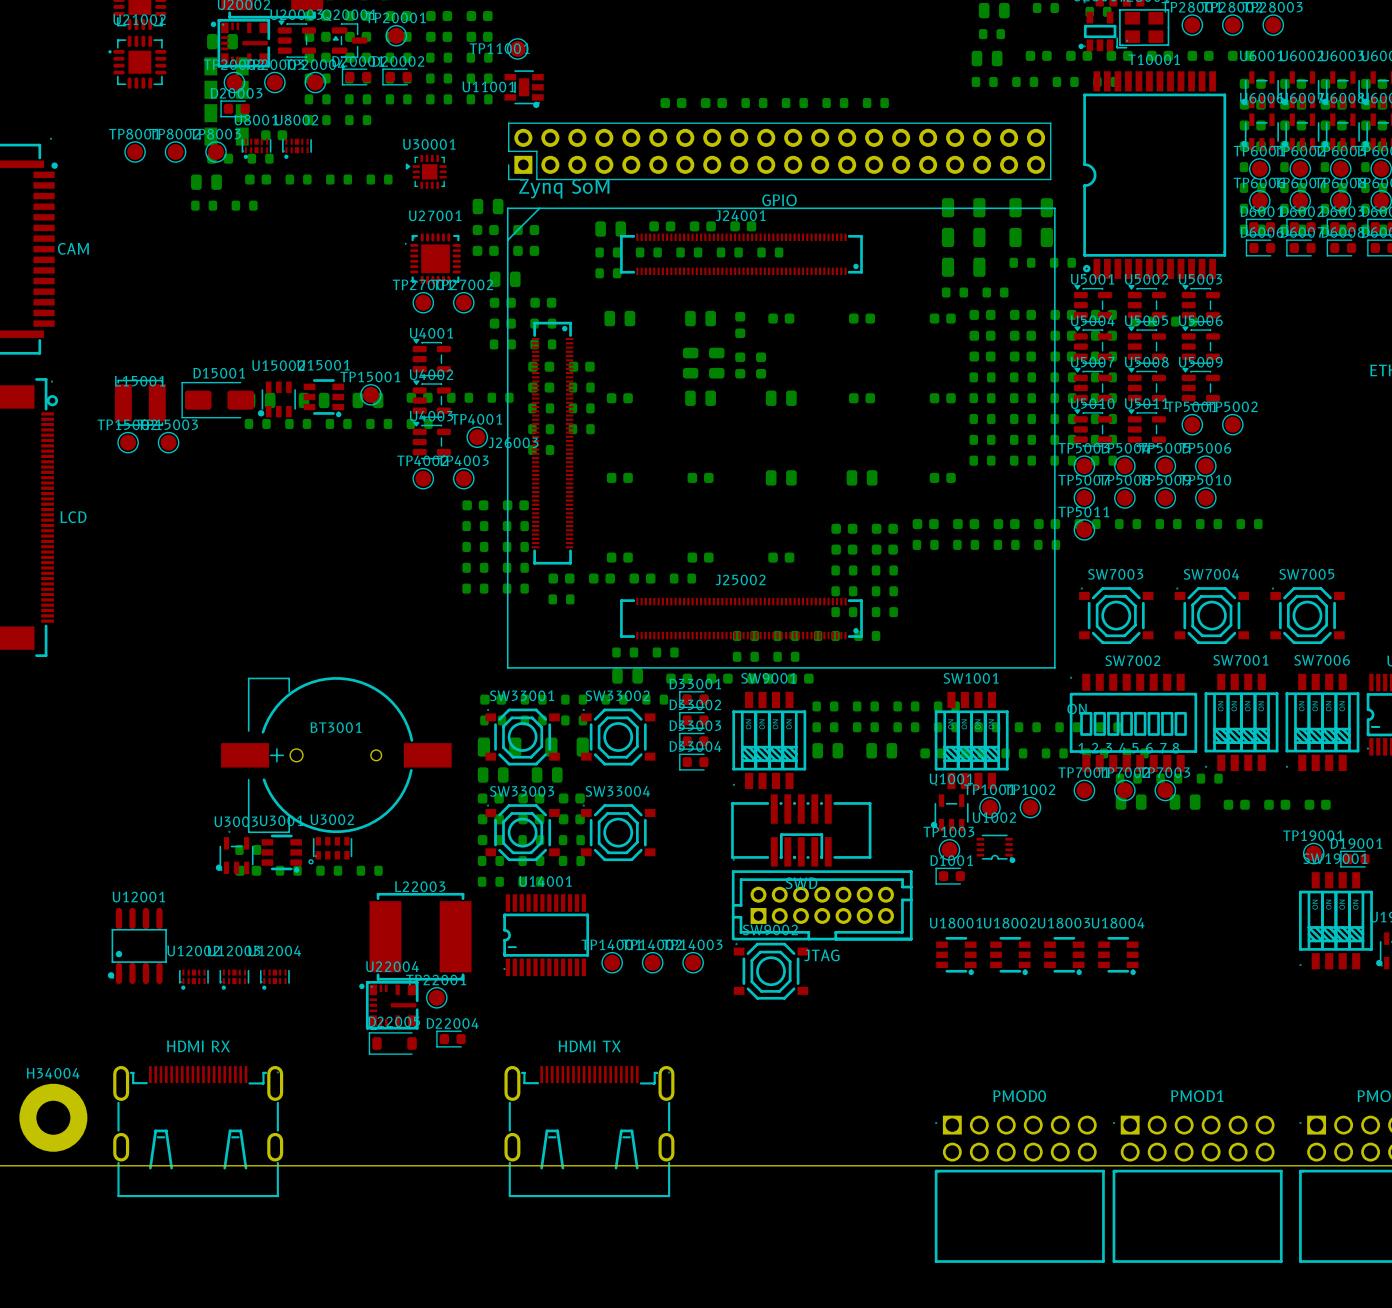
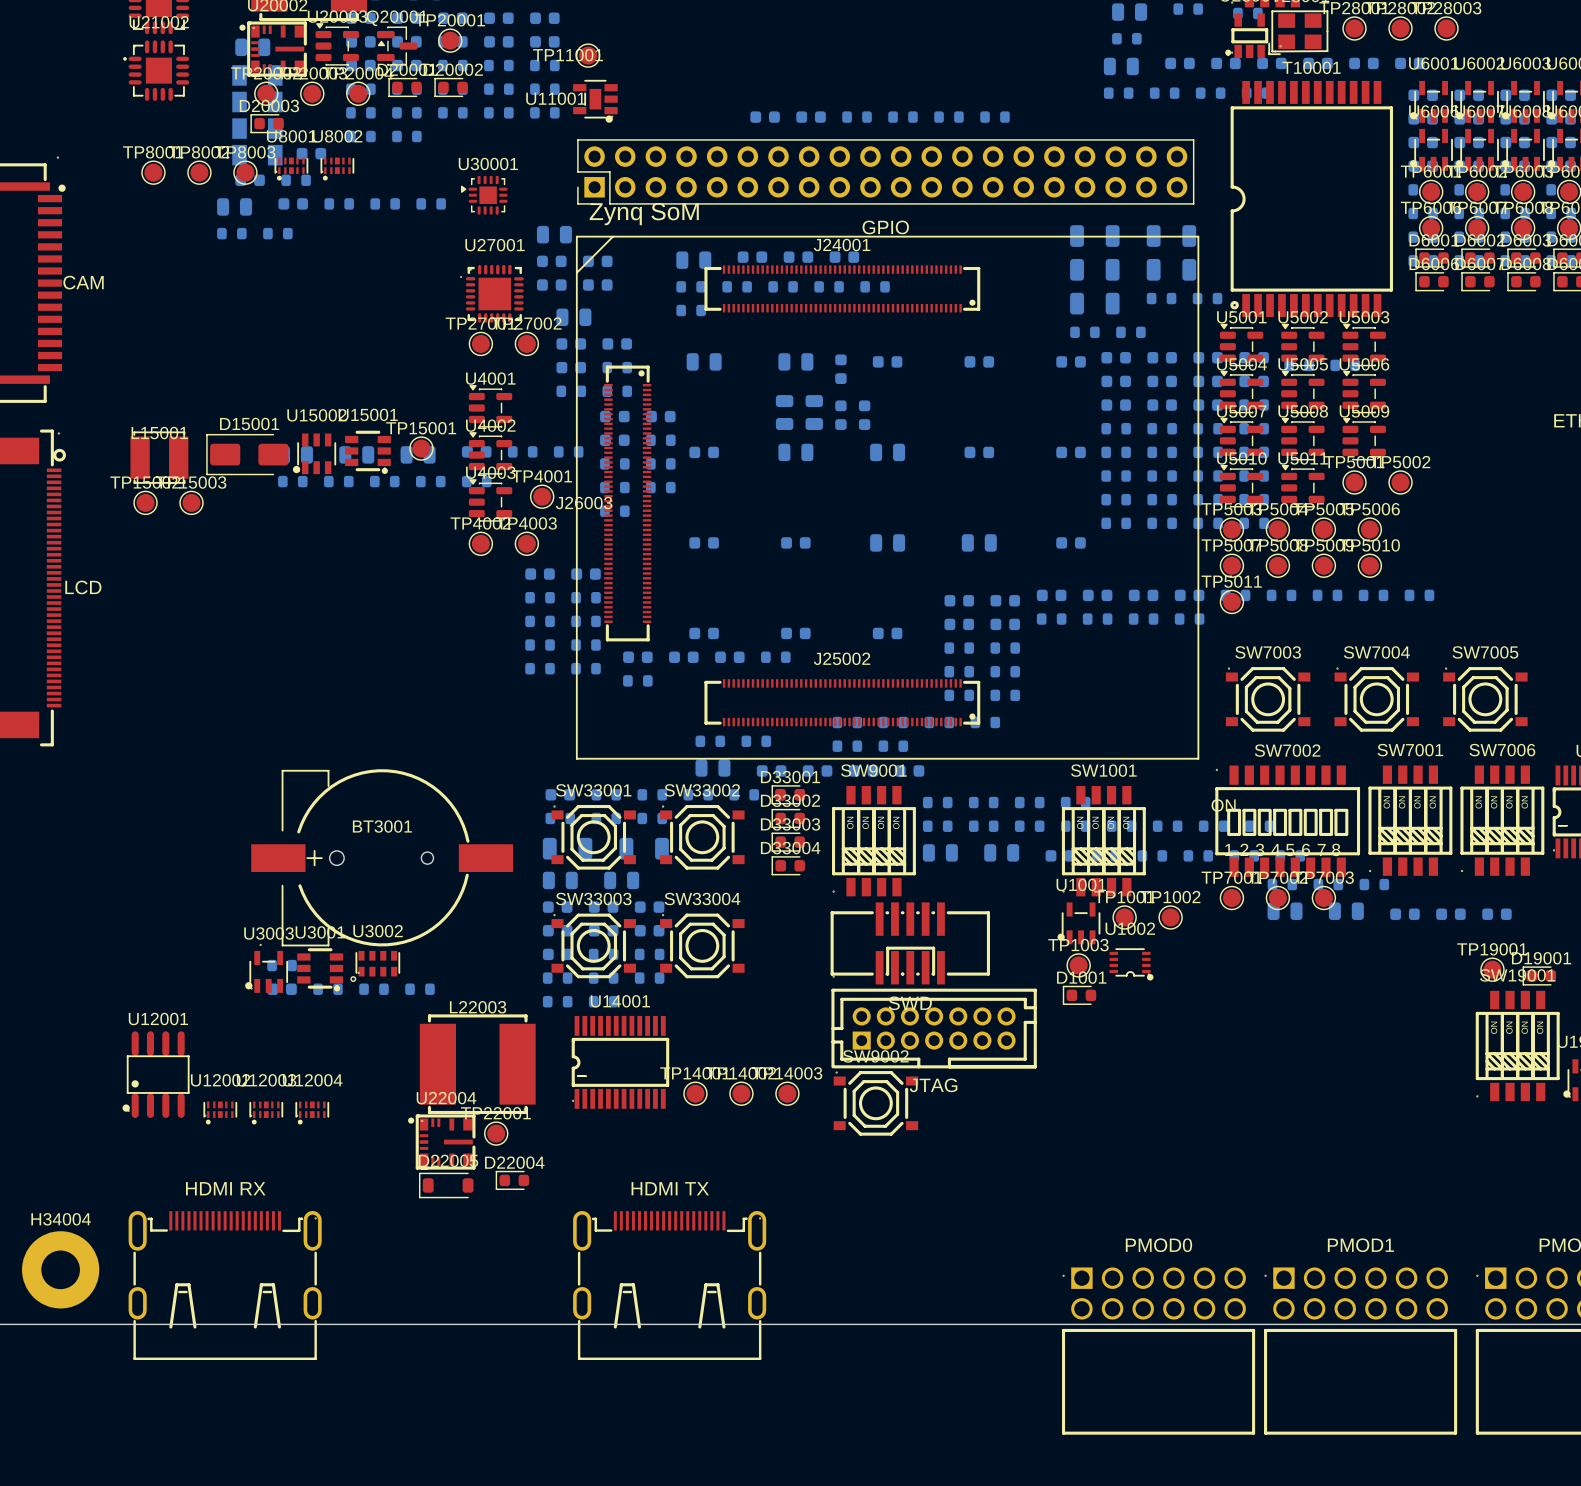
U18001: (956, 956) -> none
U18002: (1010, 956) -> none
U18003: (1064, 956) -> none
U18004: (1118, 956) -> none

